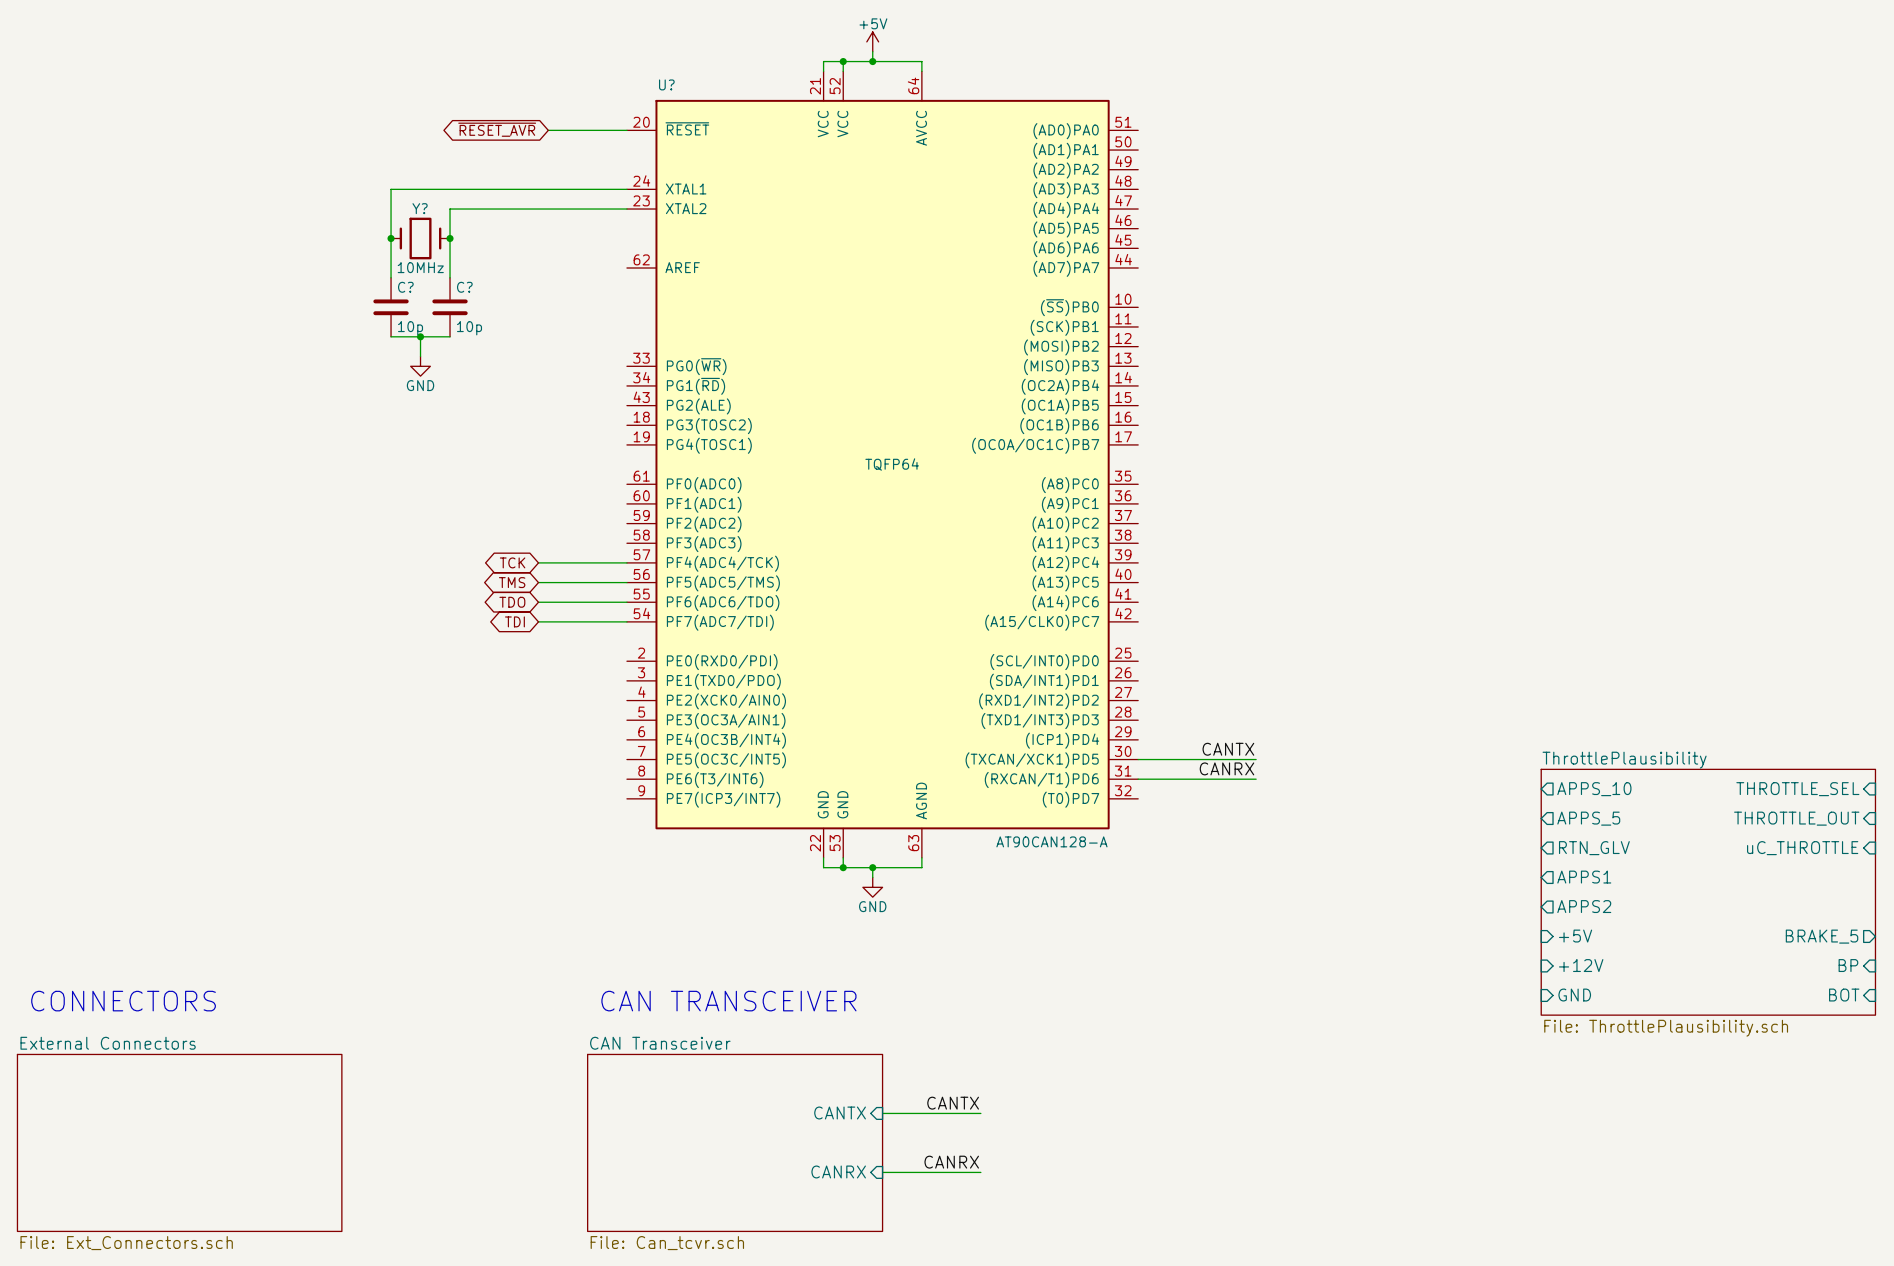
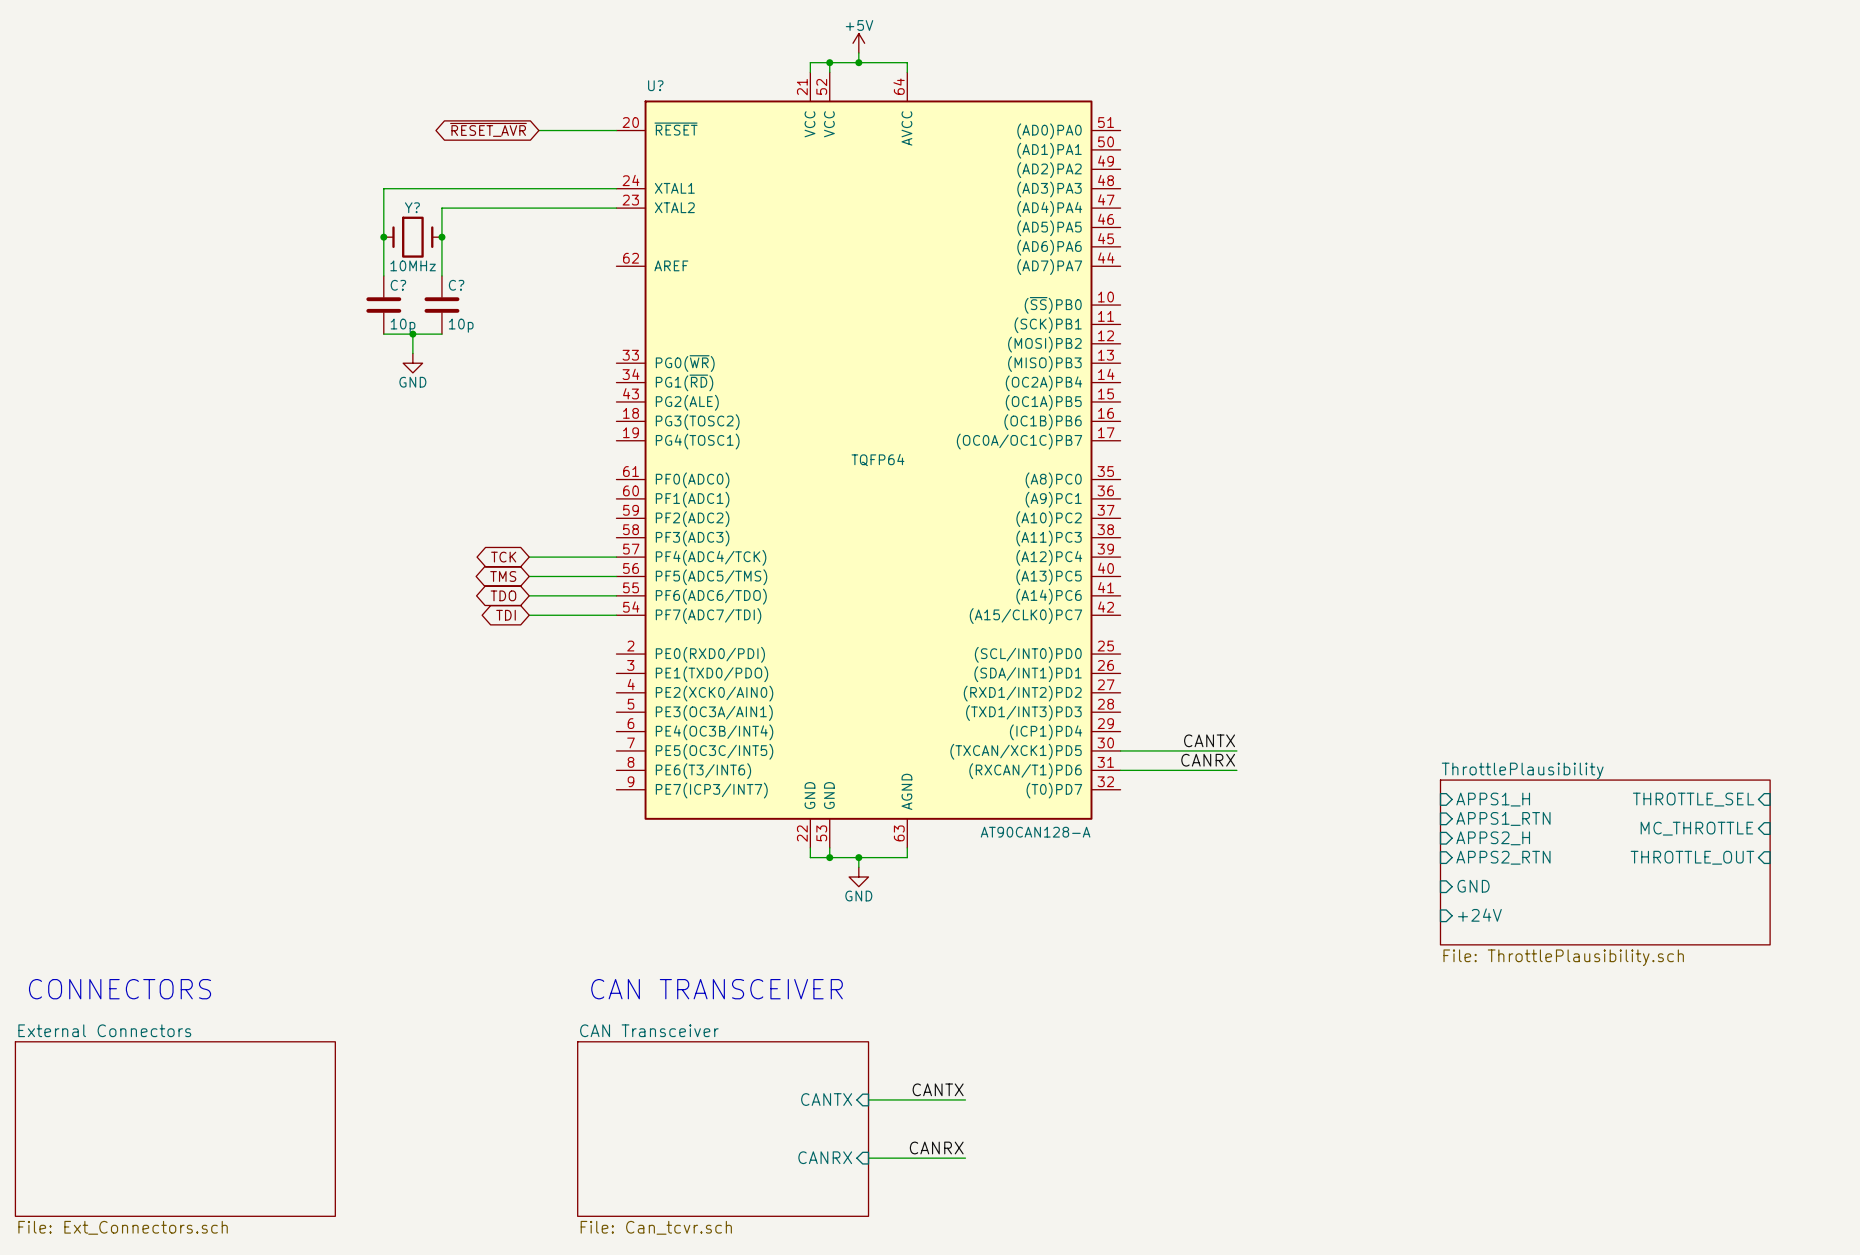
sheet pin: APPS_10 (1594, 789) -> none
sheet pin position: THROTTLE_SEL (1797, 789) -> THROTTLE_SEL (1693, 799)
sheet pin: none -> APPS1_H (1493, 799)
sheet pin: APPS_5 (1588, 818) -> none
sheet pin position: THROTTLE_OUT (1796, 818) -> THROTTLE_OUT (1692, 857)
sheet pin: none -> APPS1_RTN (1503, 818)
sheet pin: none -> APPS2_H (1493, 838)
sheet pin: RTN_GLV (1594, 848) -> none
sheet pin: uC_THROTTLE (1802, 848) -> MC_THROTTLE (1696, 828)
sheet pin: none -> APPS2_RTN (1503, 857)
sheet ThrottlePlausibility: none -> File: ThrottlePlausibility.sch (1605, 862)
sheet pin: APPS1 (1584, 877) -> none
sheet ThrottlePlausibility: File: ThrottlePlausibility.sch (1708, 892) -> none
sheet pin: APPS2 (1584, 906) -> none
sheet pin: none -> +24V (1479, 915)
sheet pin: +5V (1575, 936) -> none
sheet pin: BRAKE_5 (1822, 936) -> none
sheet pin: +12V (1581, 965) -> none
sheet pin: BP (1848, 965) -> none
sheet pin position: GND (1574, 995) -> GND (1473, 886)
sheet pin: BOT (1844, 995) -> none

